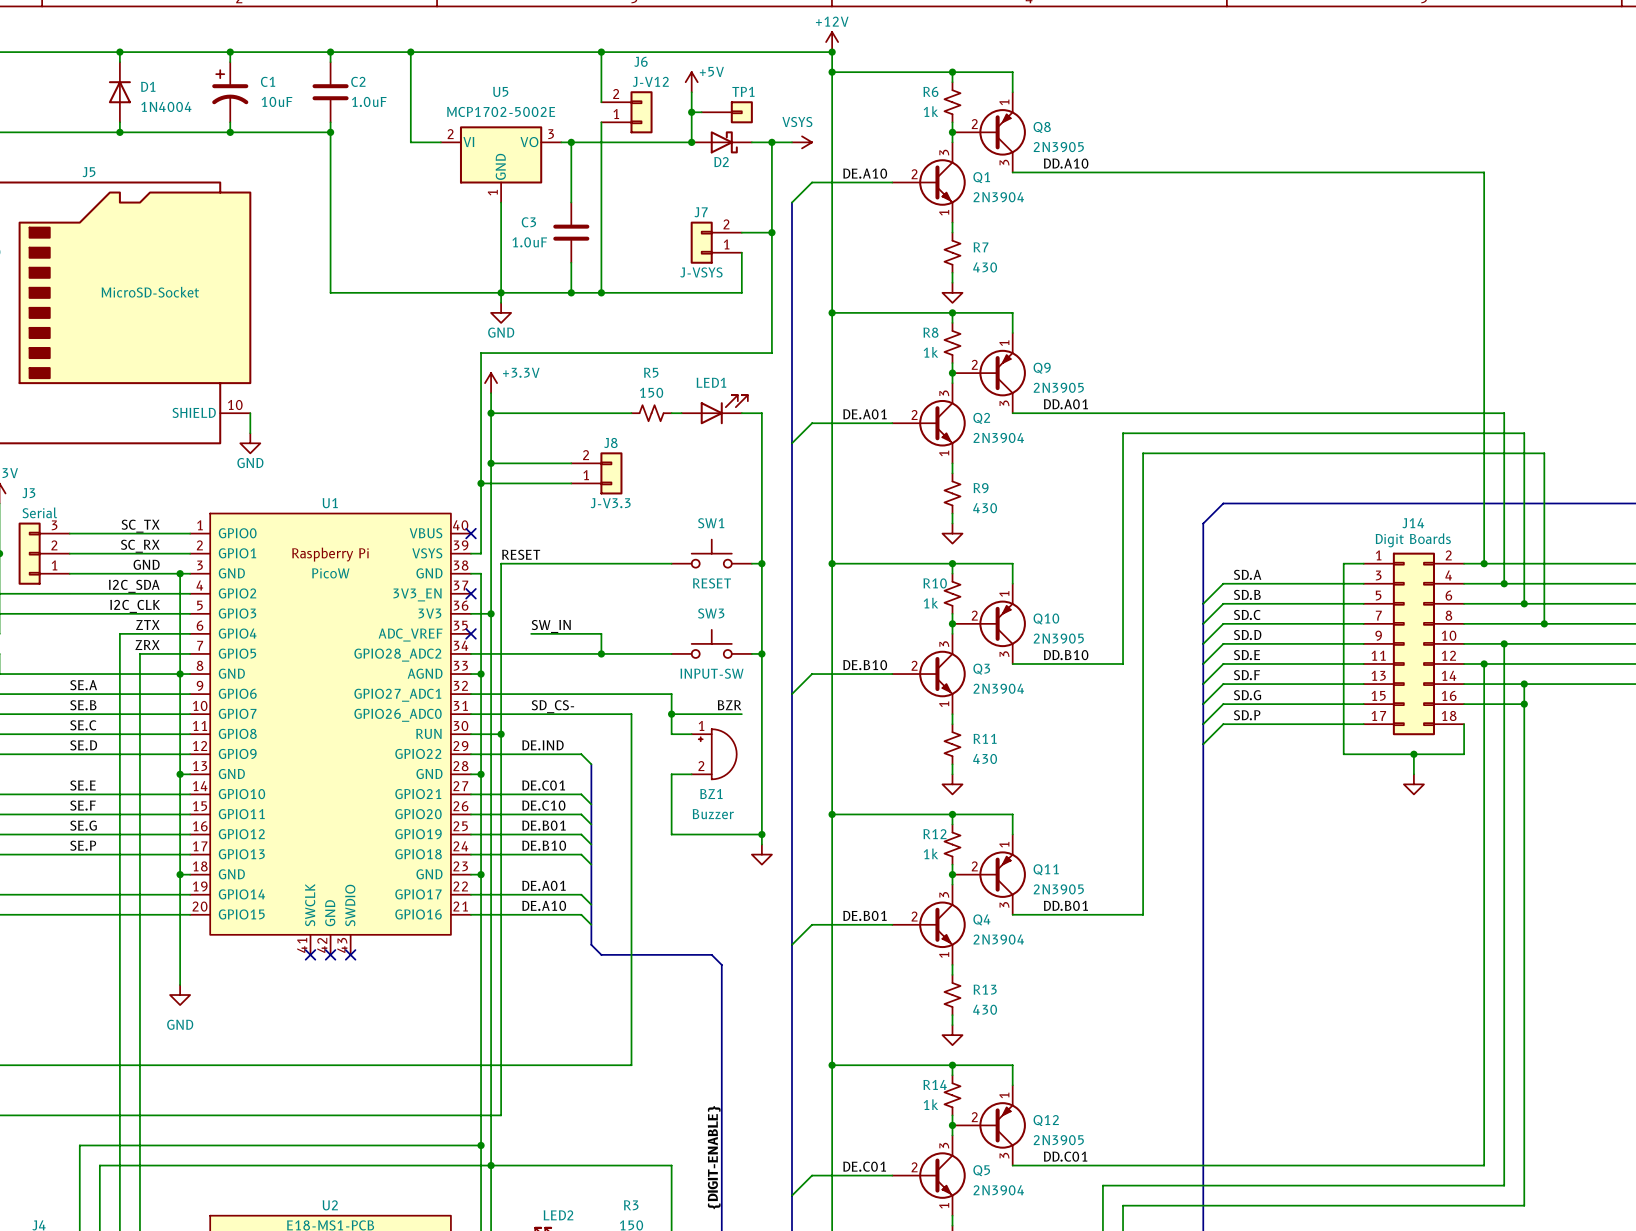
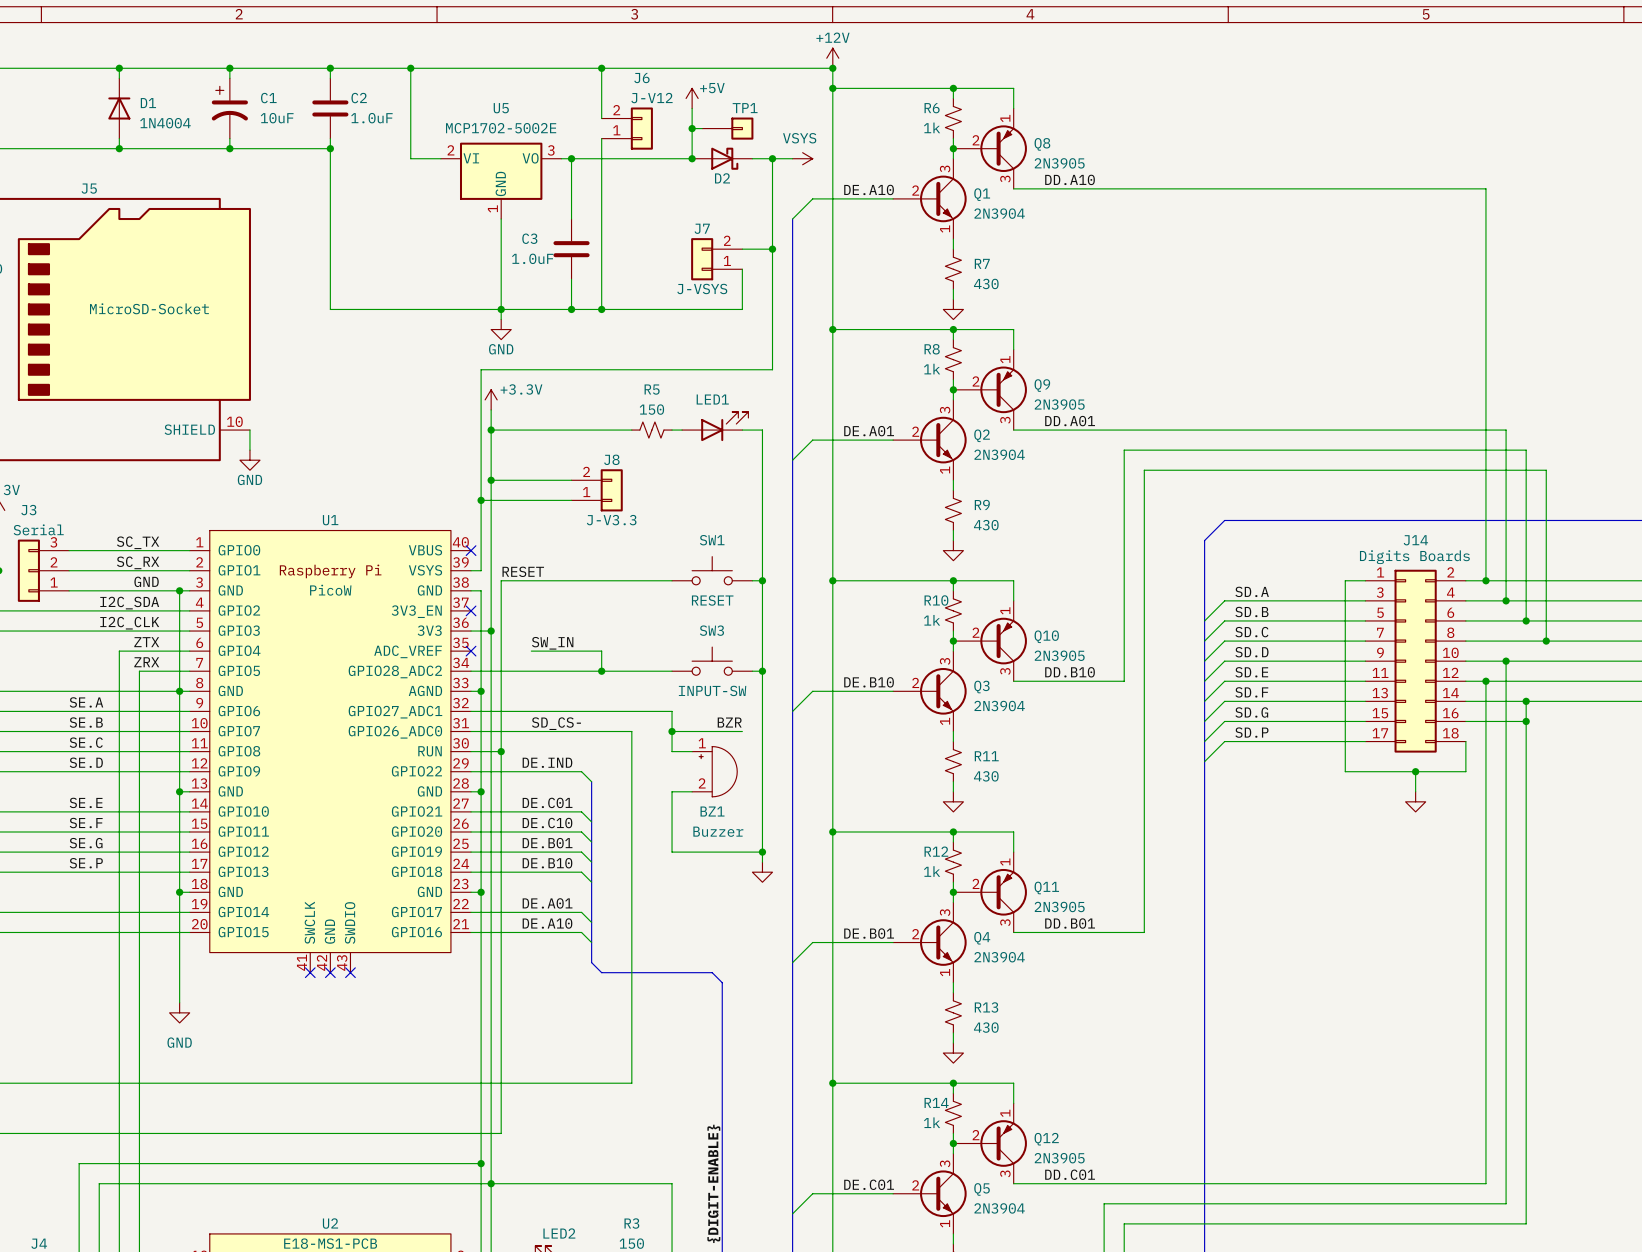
J14 text: Digit Boards (1413, 540) -> Digits Boards (1414, 557)

